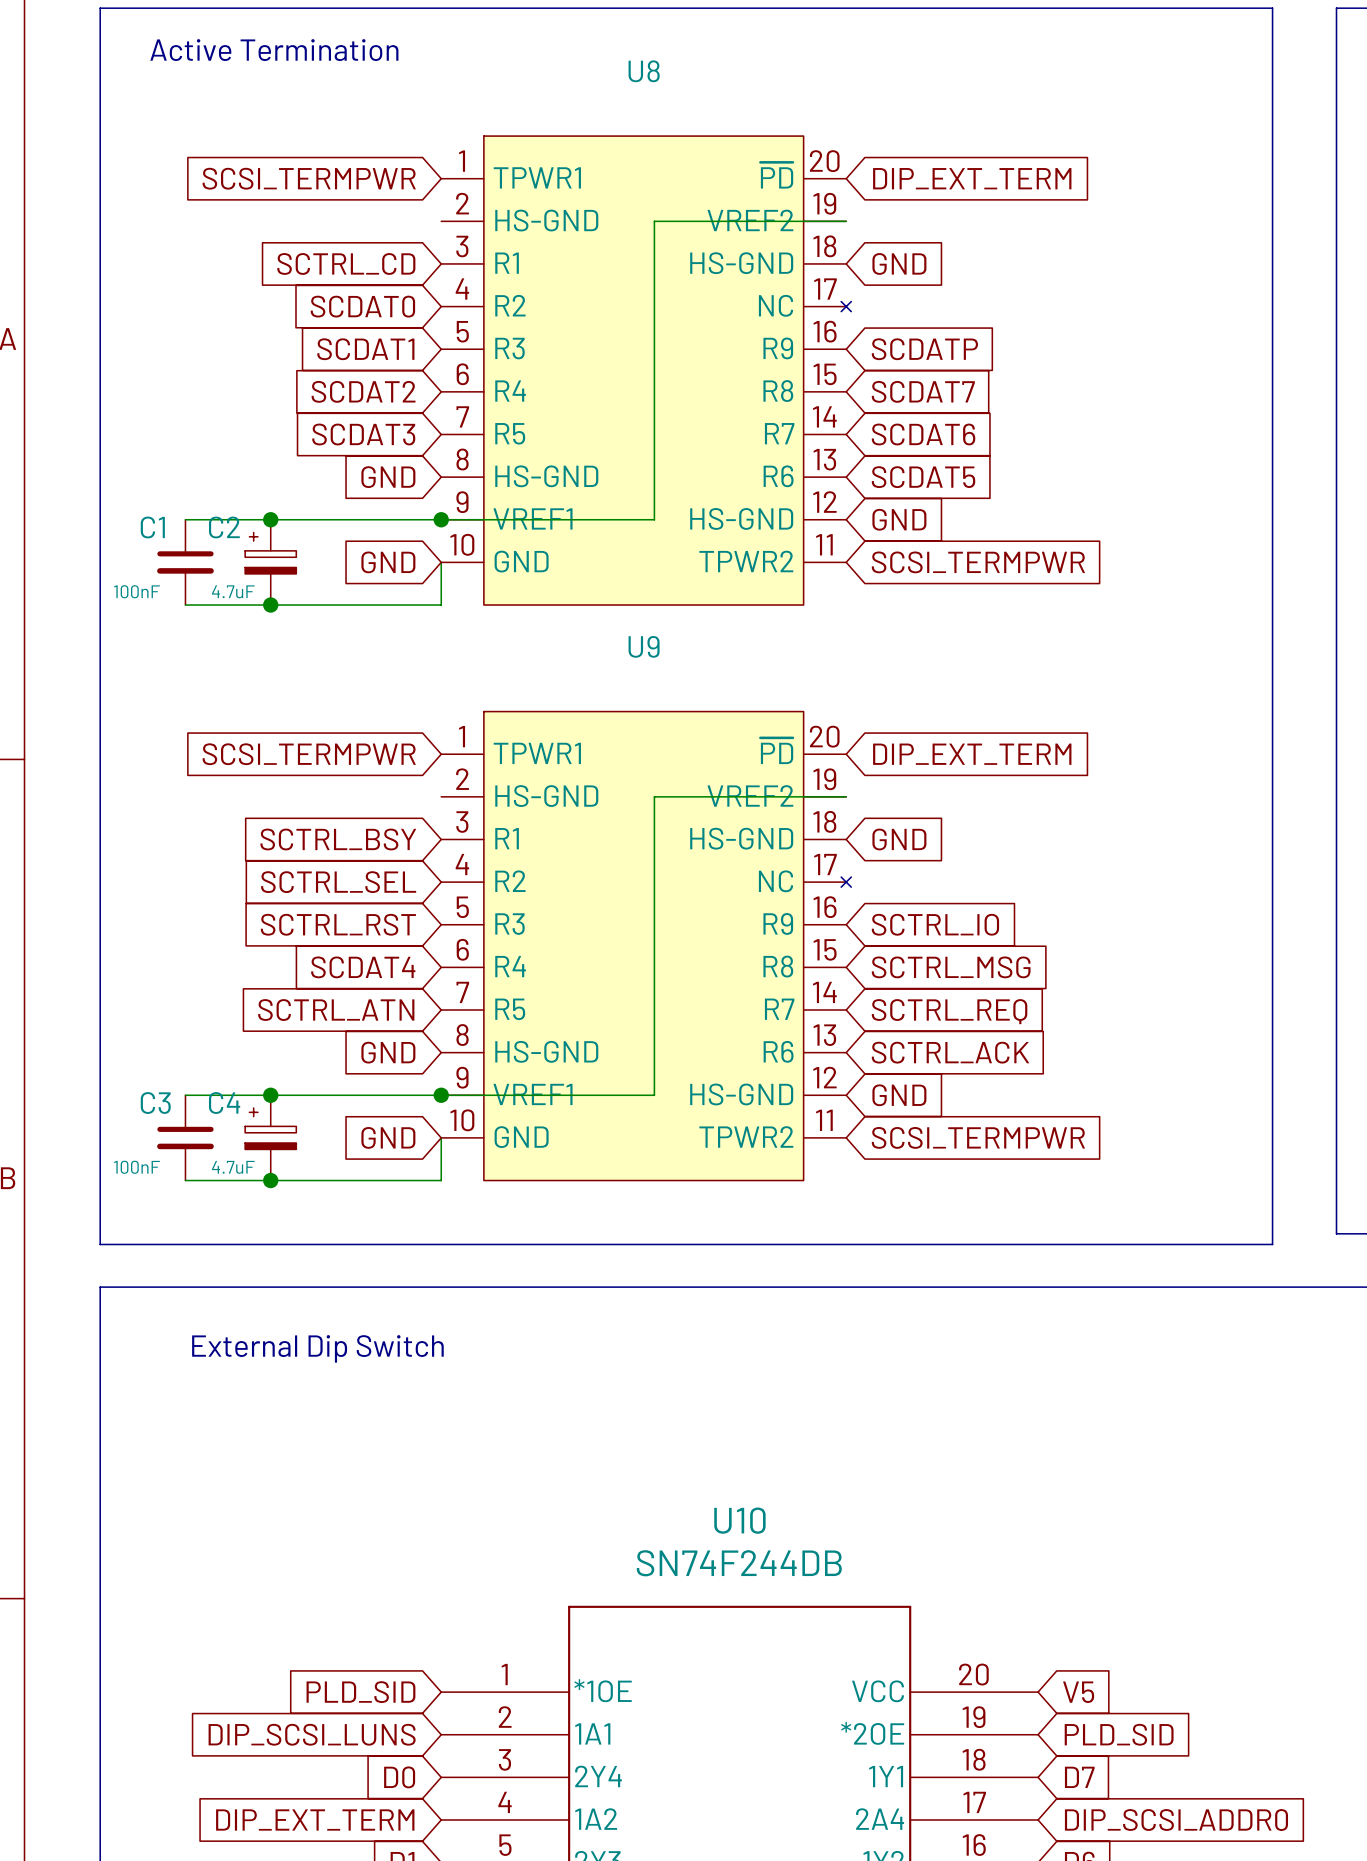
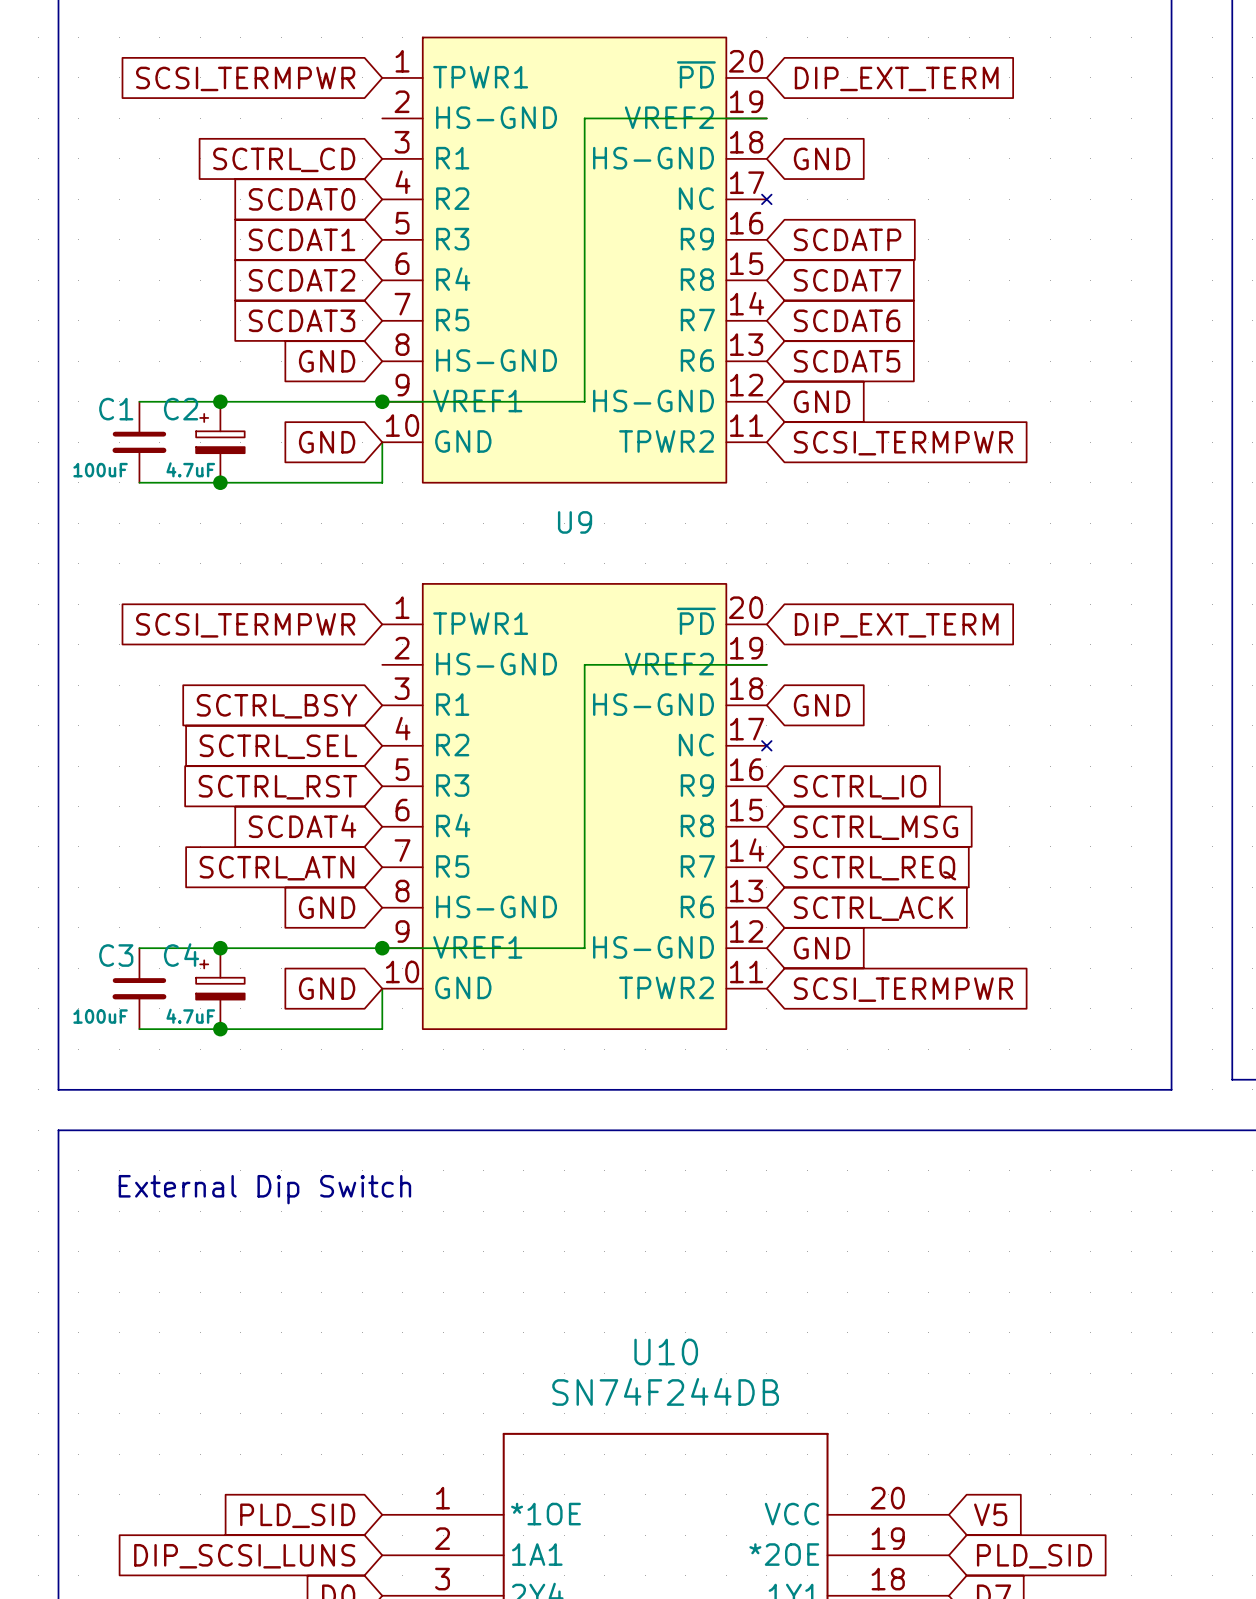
C1 value: 100nF (136, 591) -> 100uF (100, 470)
C3 value: 100nF (136, 1167) -> 100uF (100, 1016)

